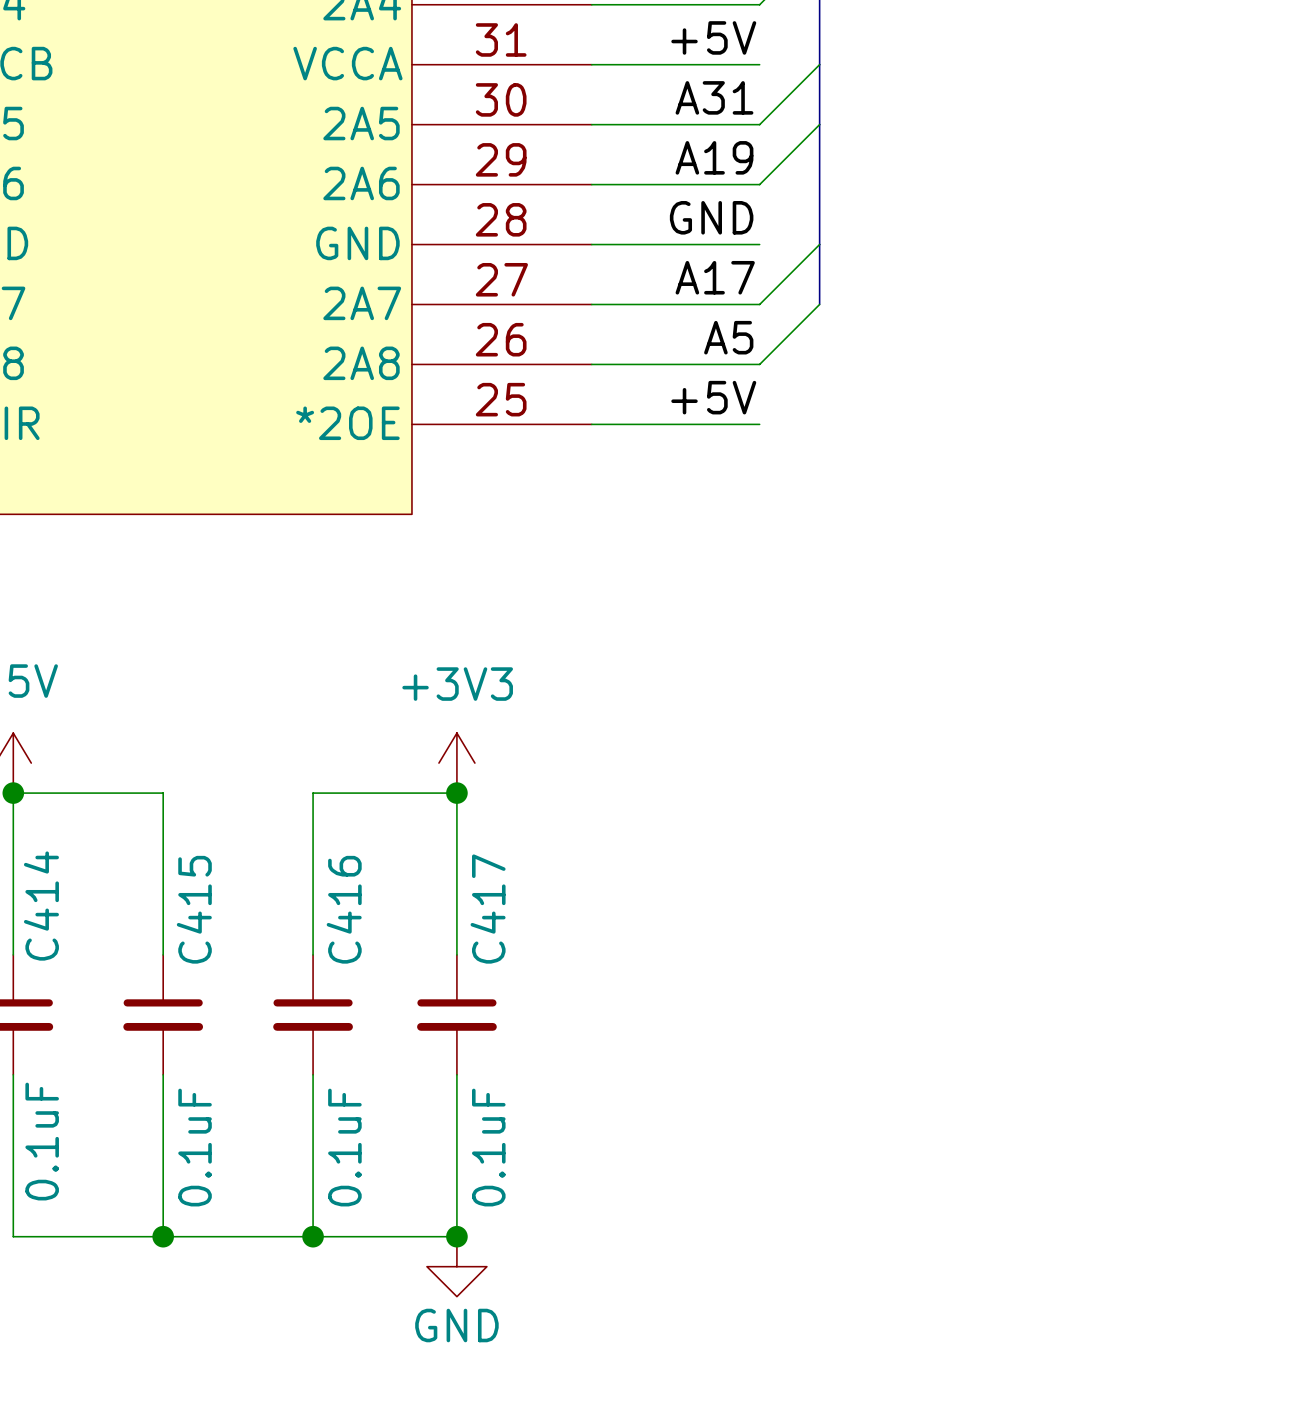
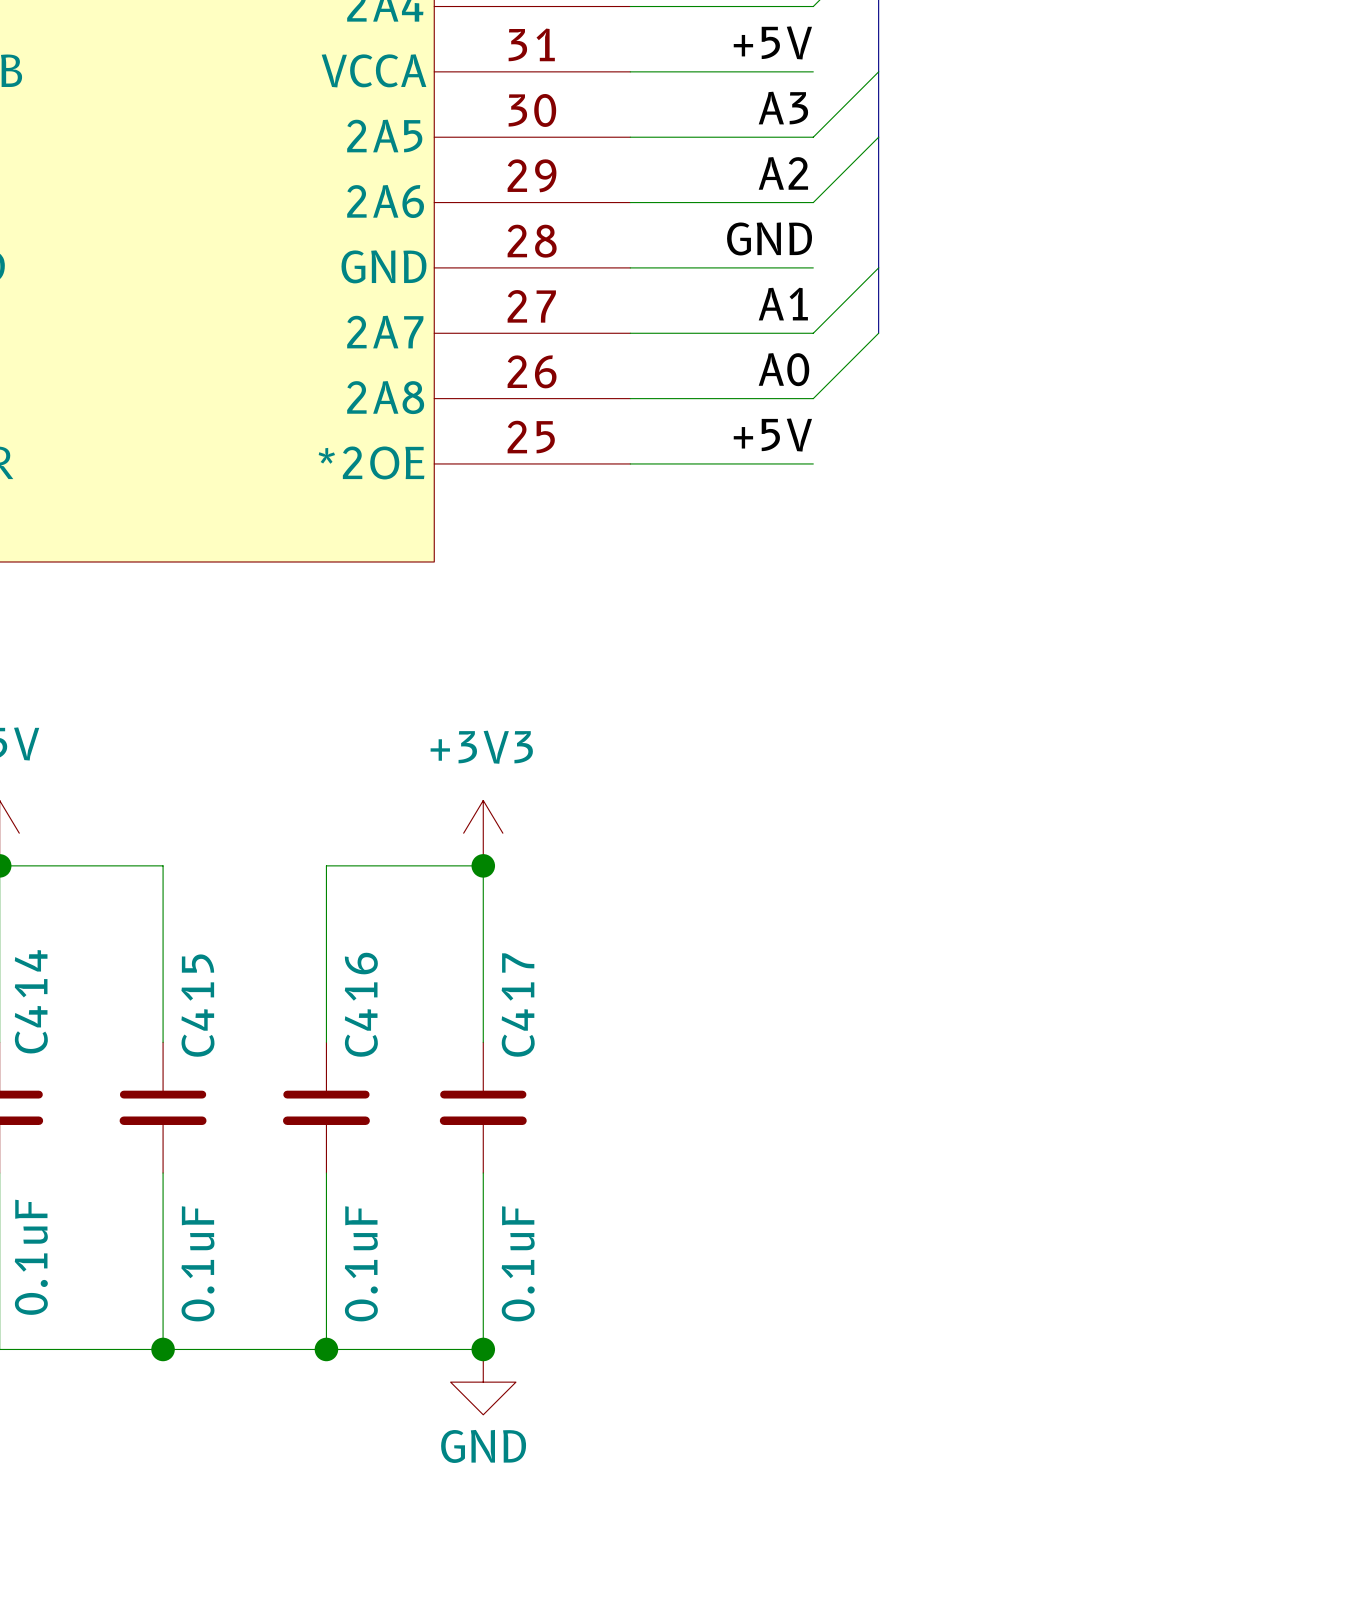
label: A31 (714, 97) -> A3 (783, 108)
label: A19 (714, 157) -> A2 (783, 173)
label: A17 (715, 277) -> A1 (783, 304)
label: A5 (728, 337) -> A0 (783, 369)

